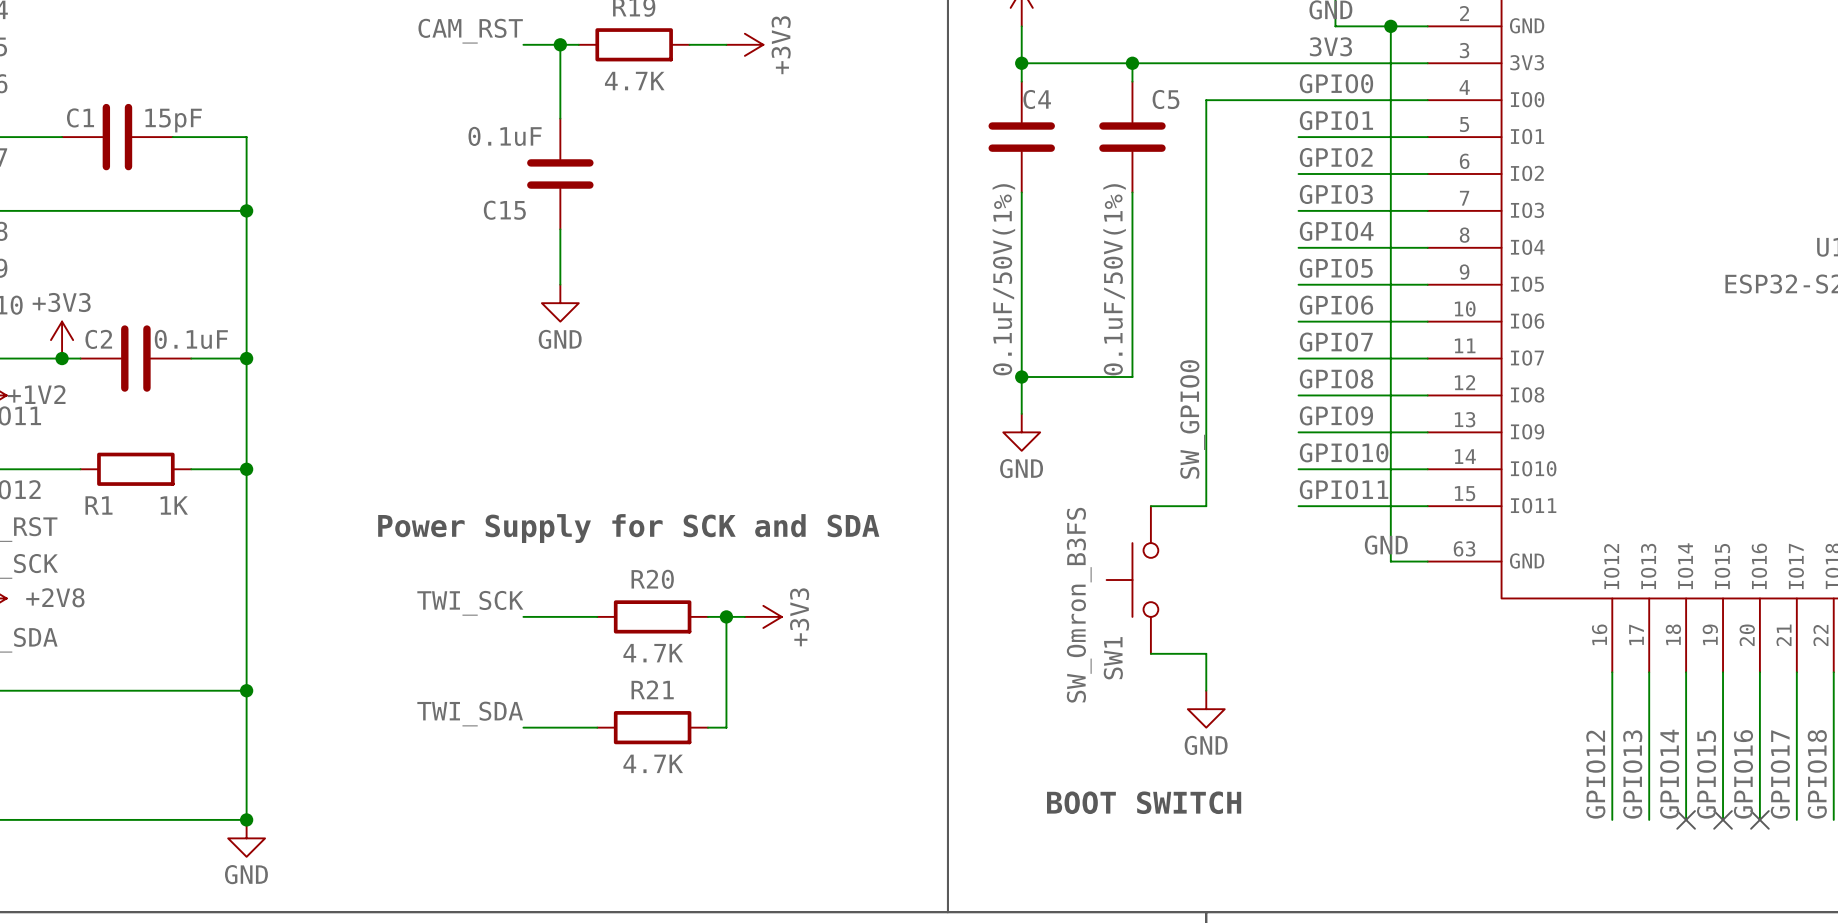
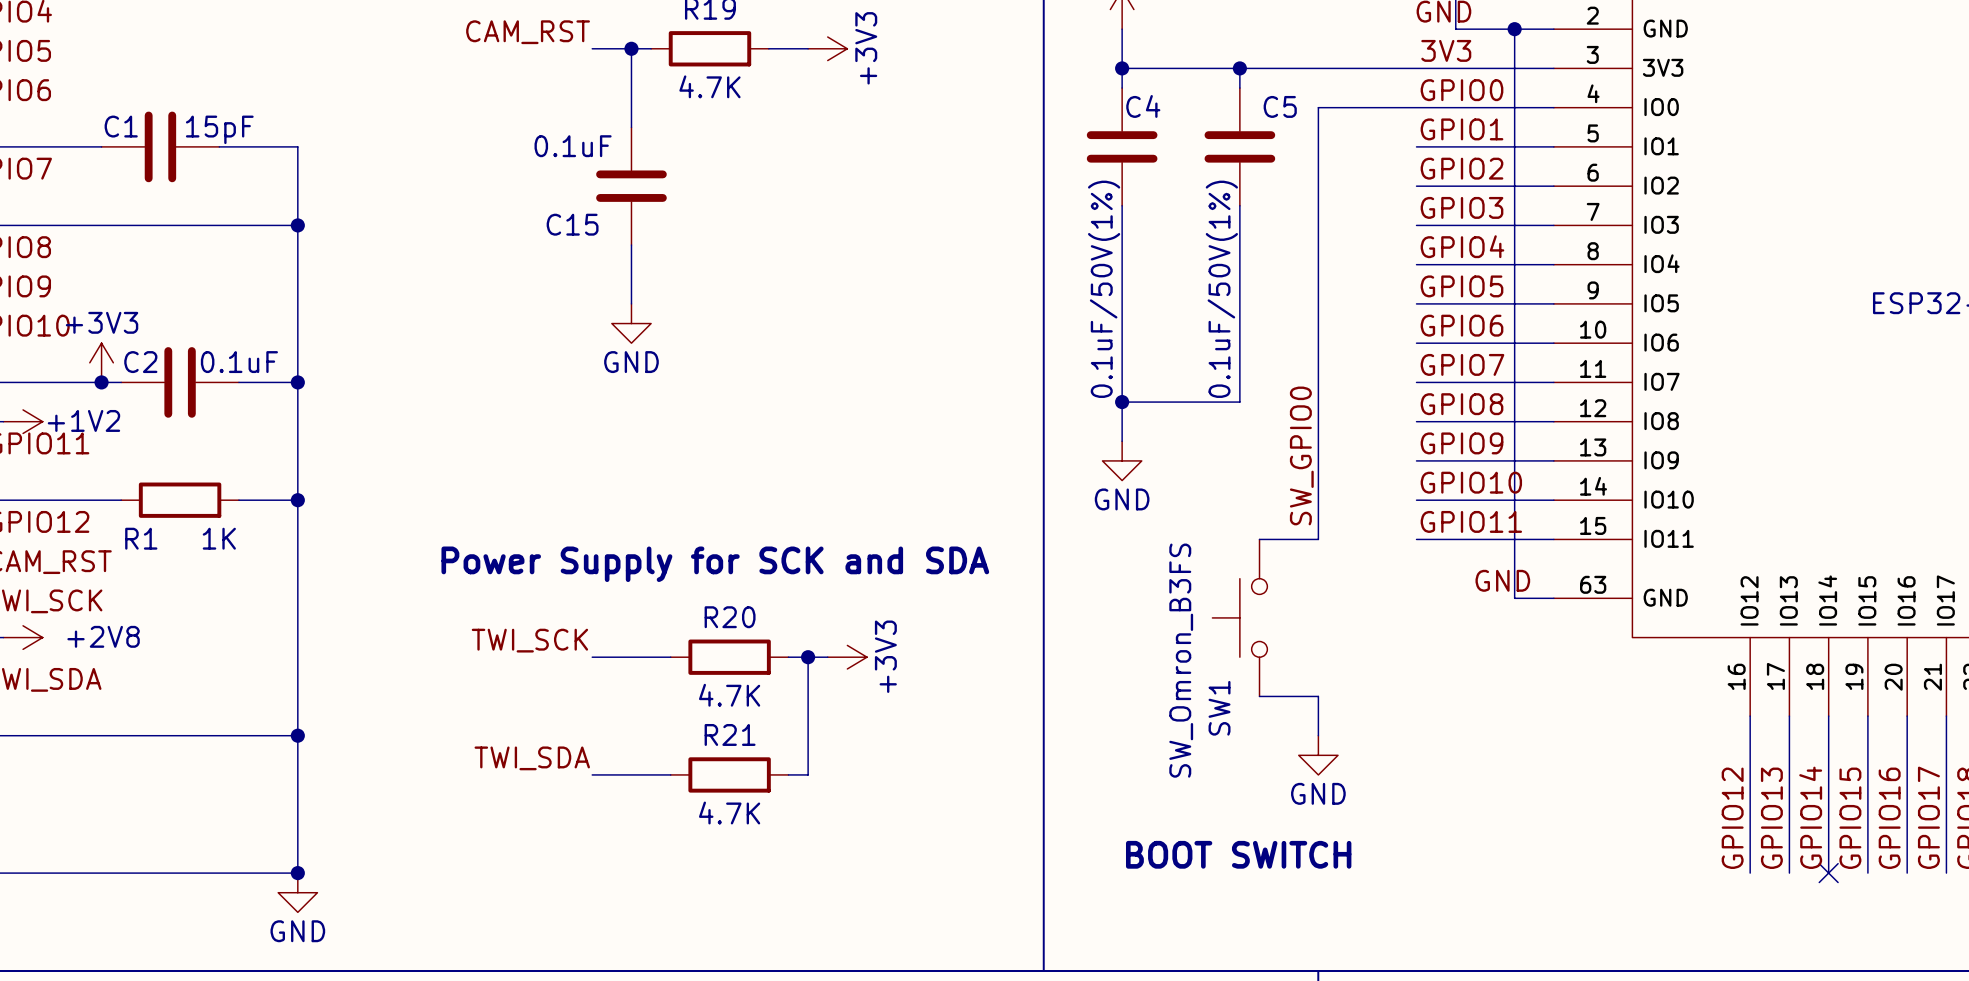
no-connect mark: (1723, 819) -> none
no-connect mark: (1759, 819) -> none

